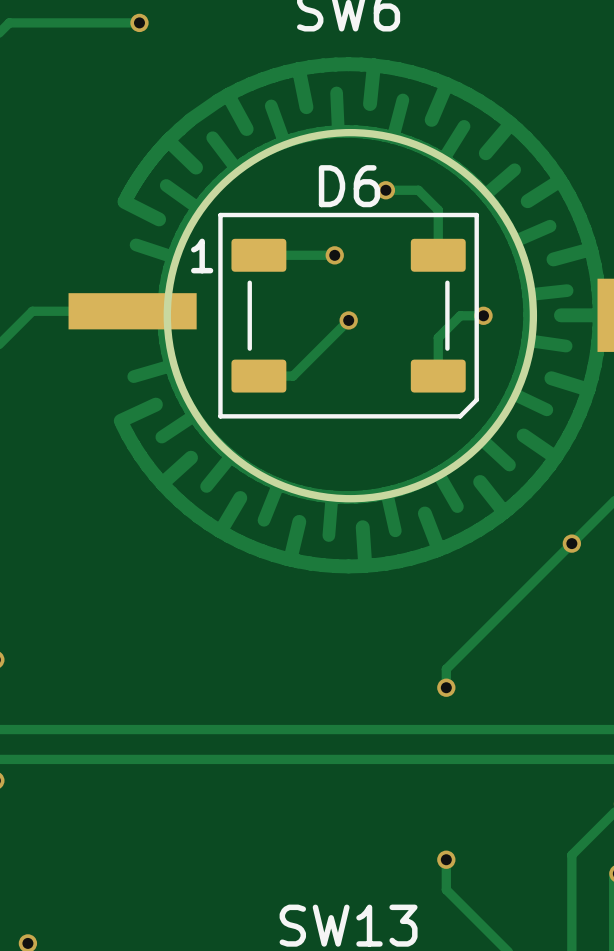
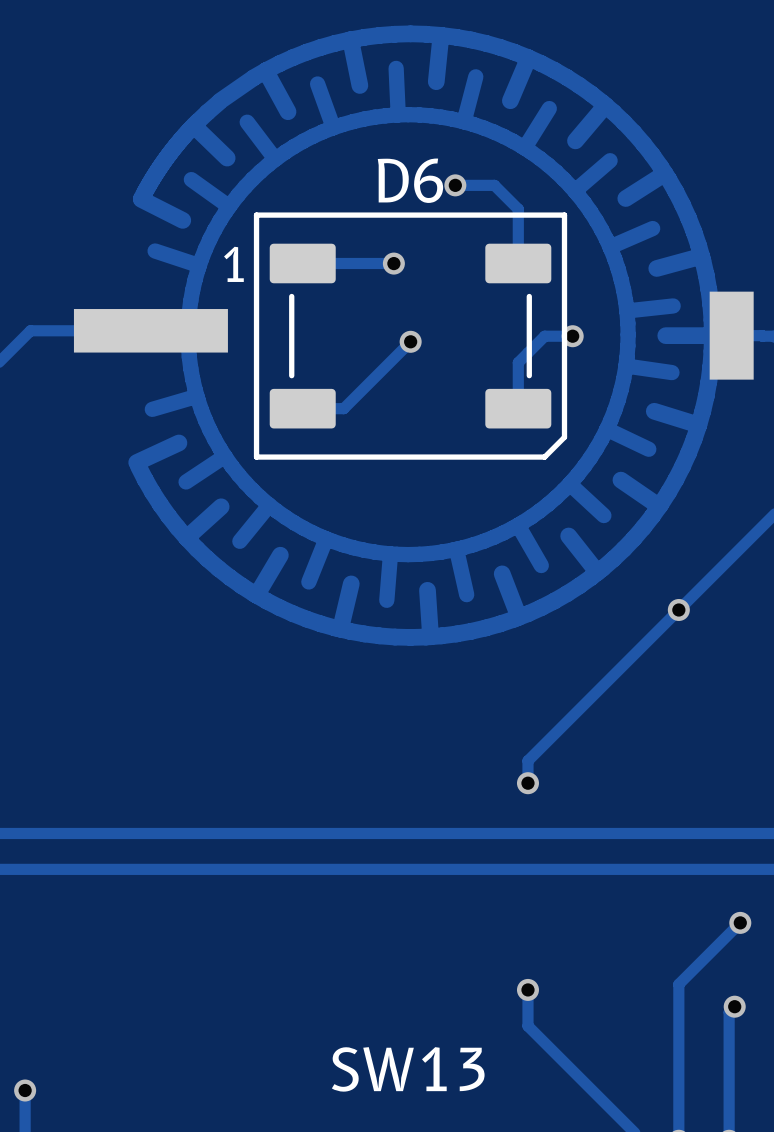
round board edge: [163, 128, 538, 503] -> none

